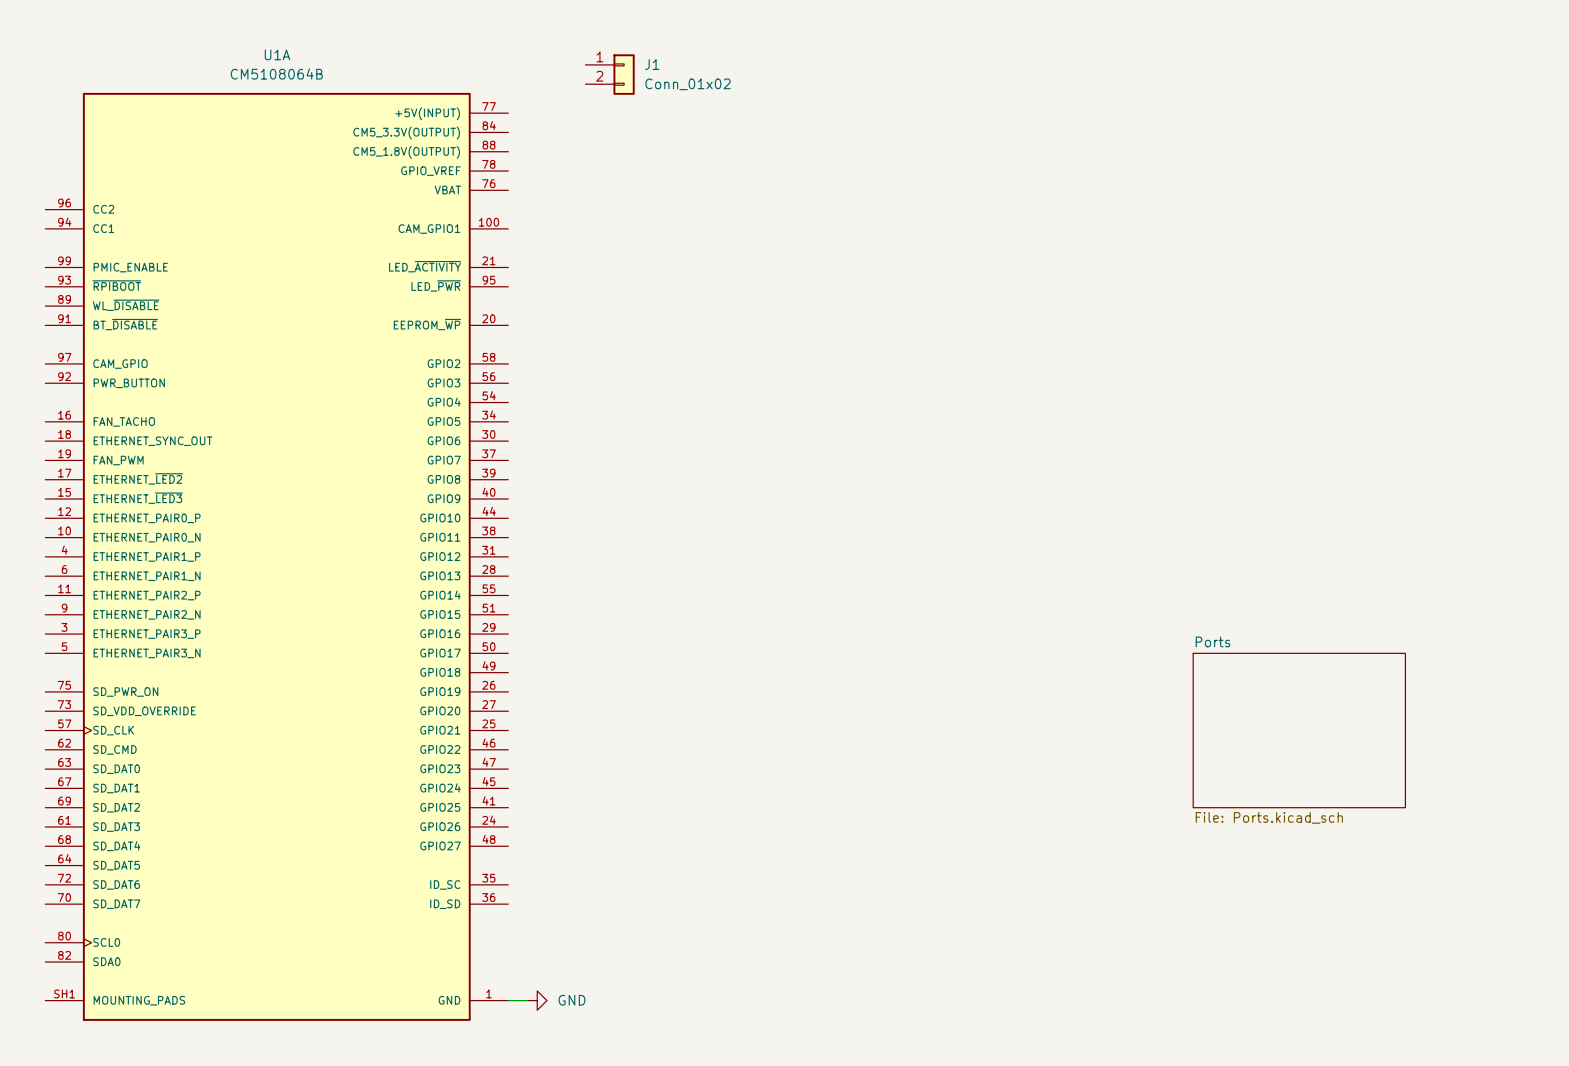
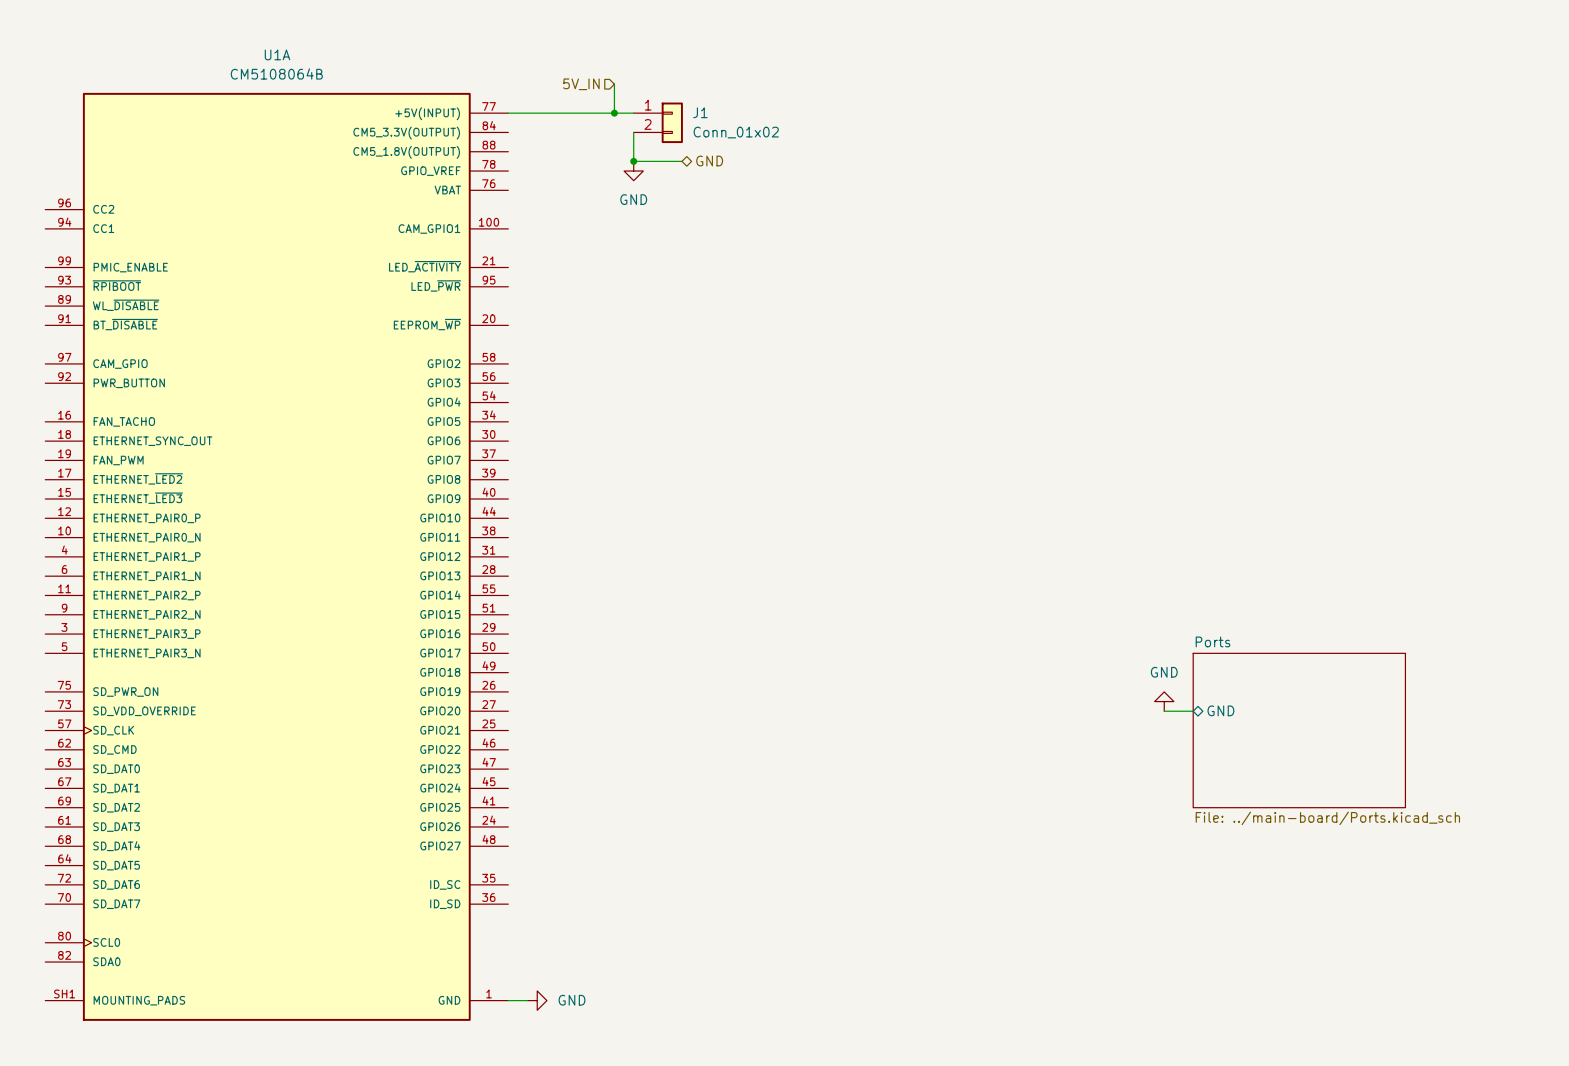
J1 position: (610, 74) -> (658, 122)
hierarchical label: none -> 5V_IN (581, 84)
wire: none -> (614, 84) (614, 113)
wire: none -> (508, 113) (633, 113)
junction: none -> (614, 113)
wire: none -> (633, 132) (633, 161) (681, 161)
junction: none -> (633, 161)
hierarchical label: none -> GND (709, 161)
power symbol: none -> GND (633, 171)
power symbol: none -> GND (1164, 701)
sheet pin: none -> GND (1220, 710)
wire: none -> (1164, 711) (1193, 711)
sheet Ports value: File: Ports.kicad_sch (1269, 817) -> File: ../main-board/Ports.kicad_sch (1327, 818)

